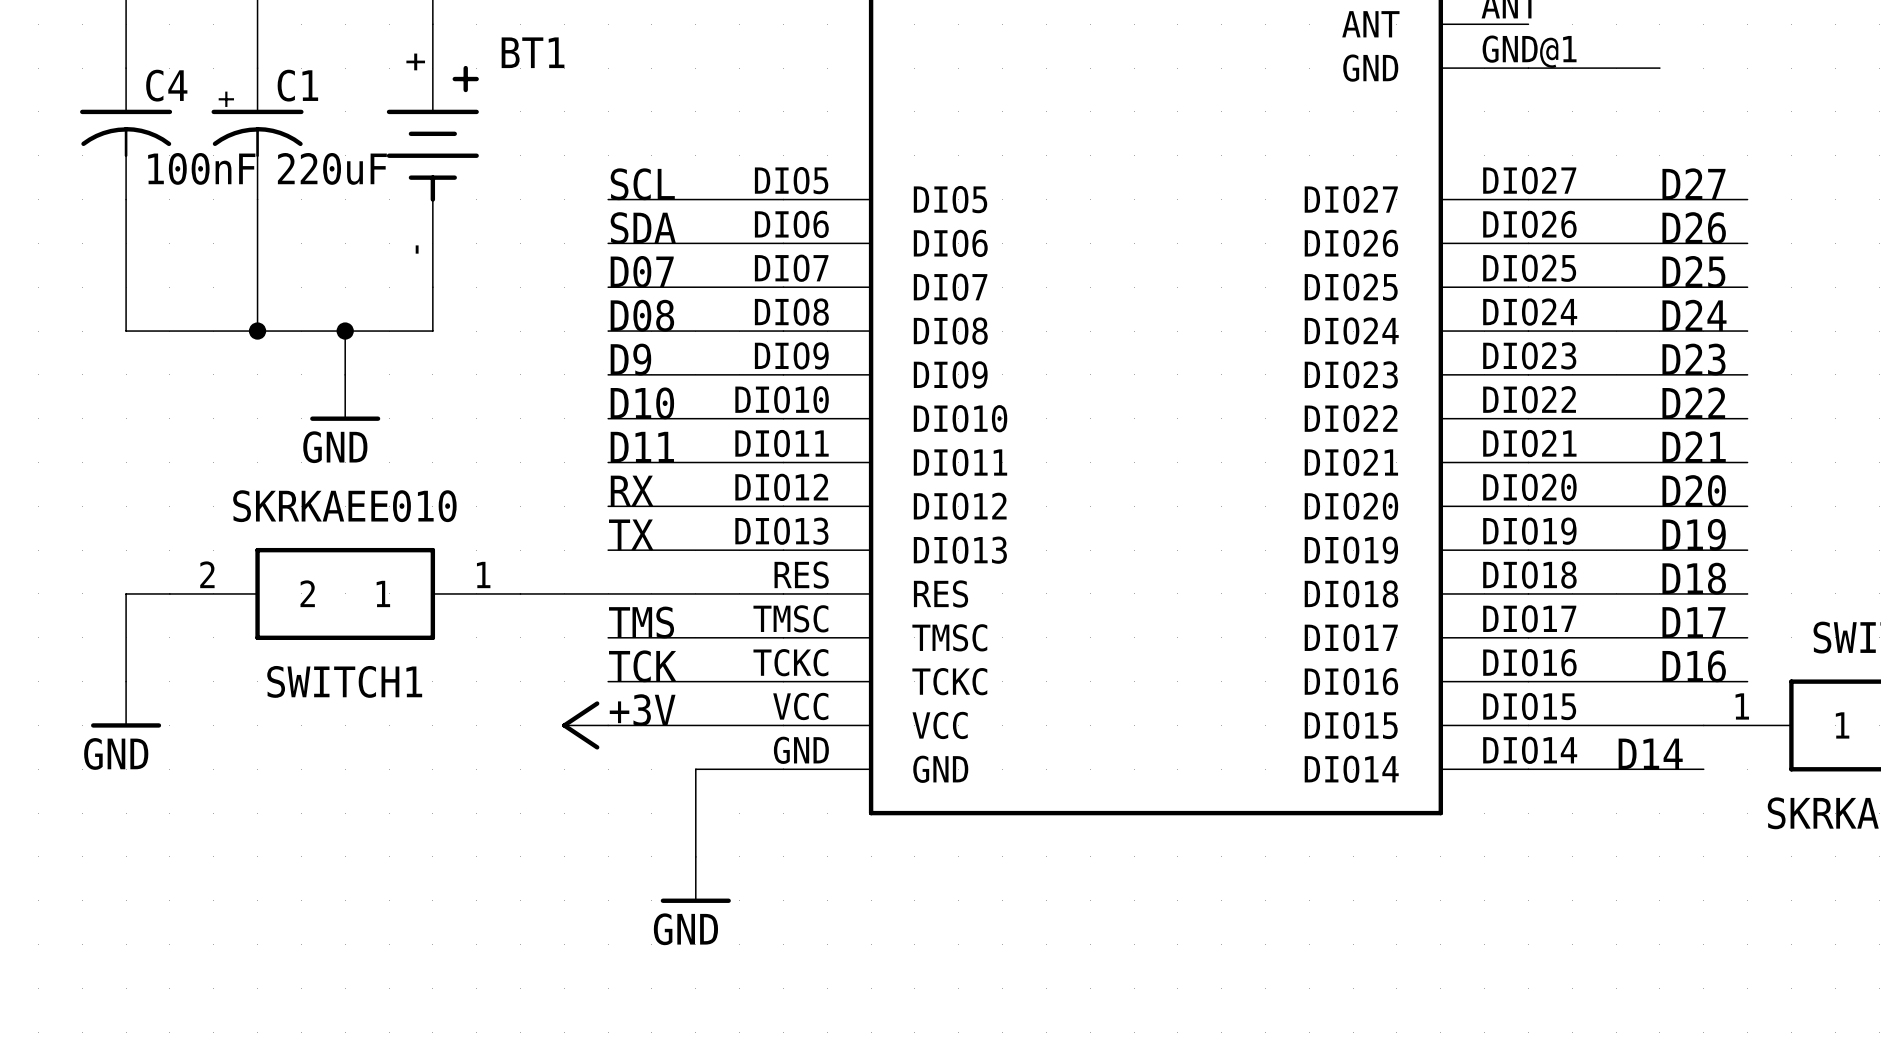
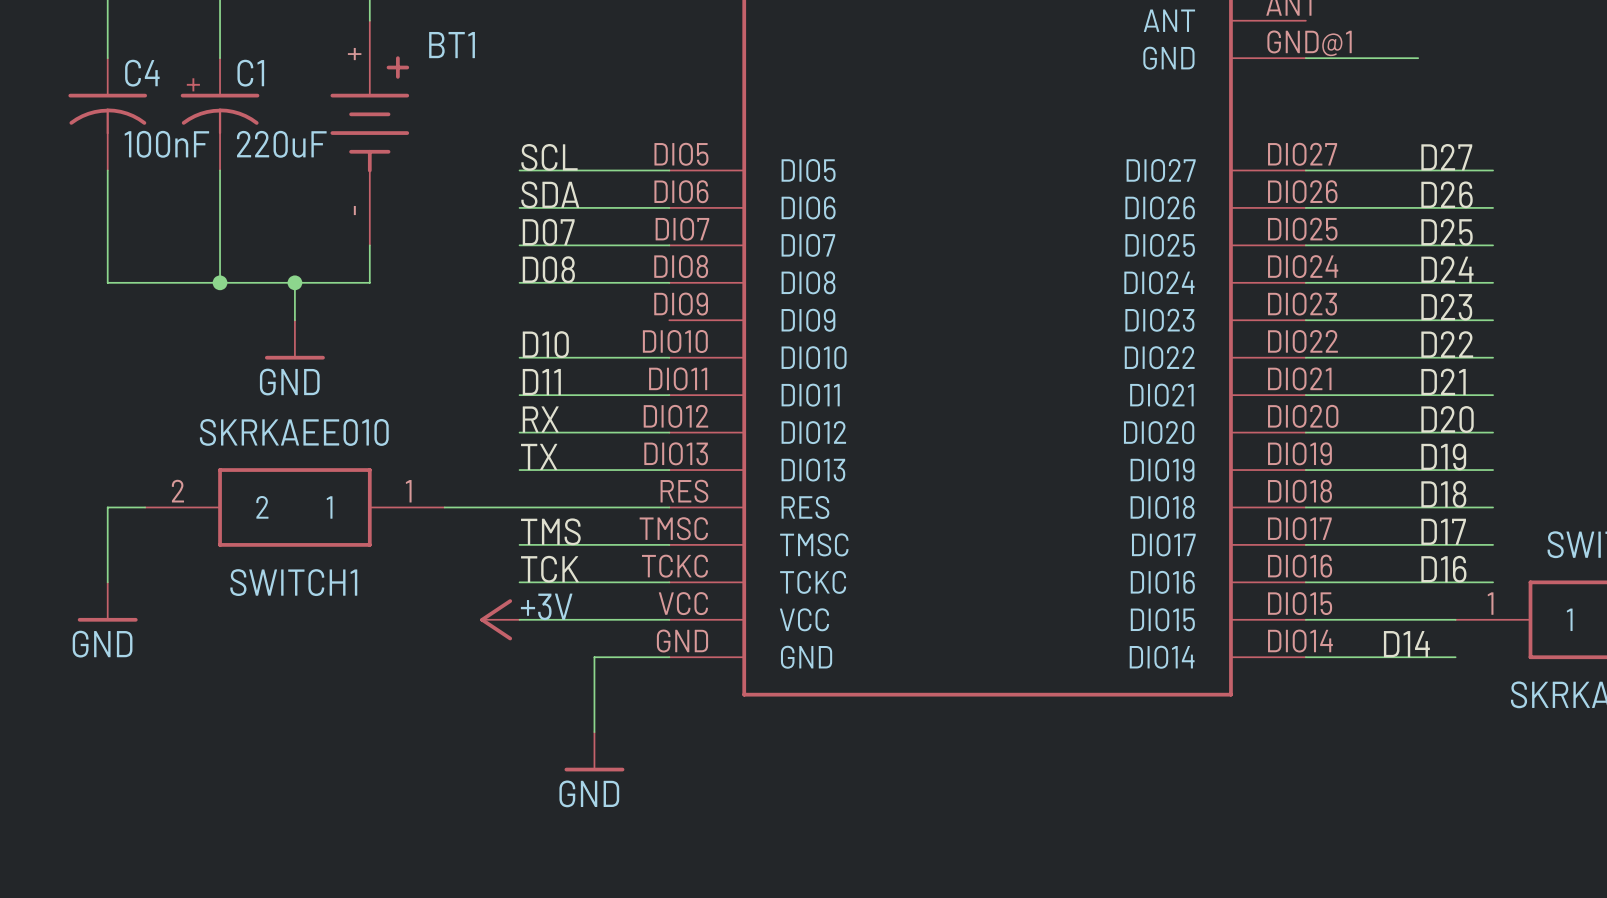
label: D9 (630, 359) -> none
wire: (608, 374) (783, 374) -> none

